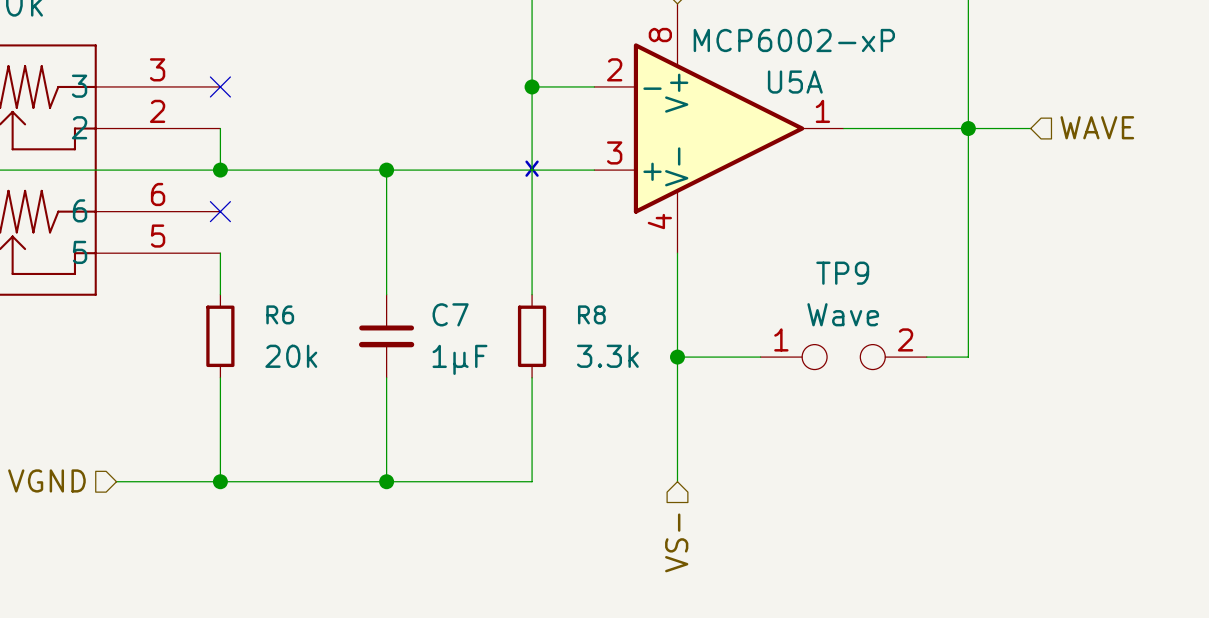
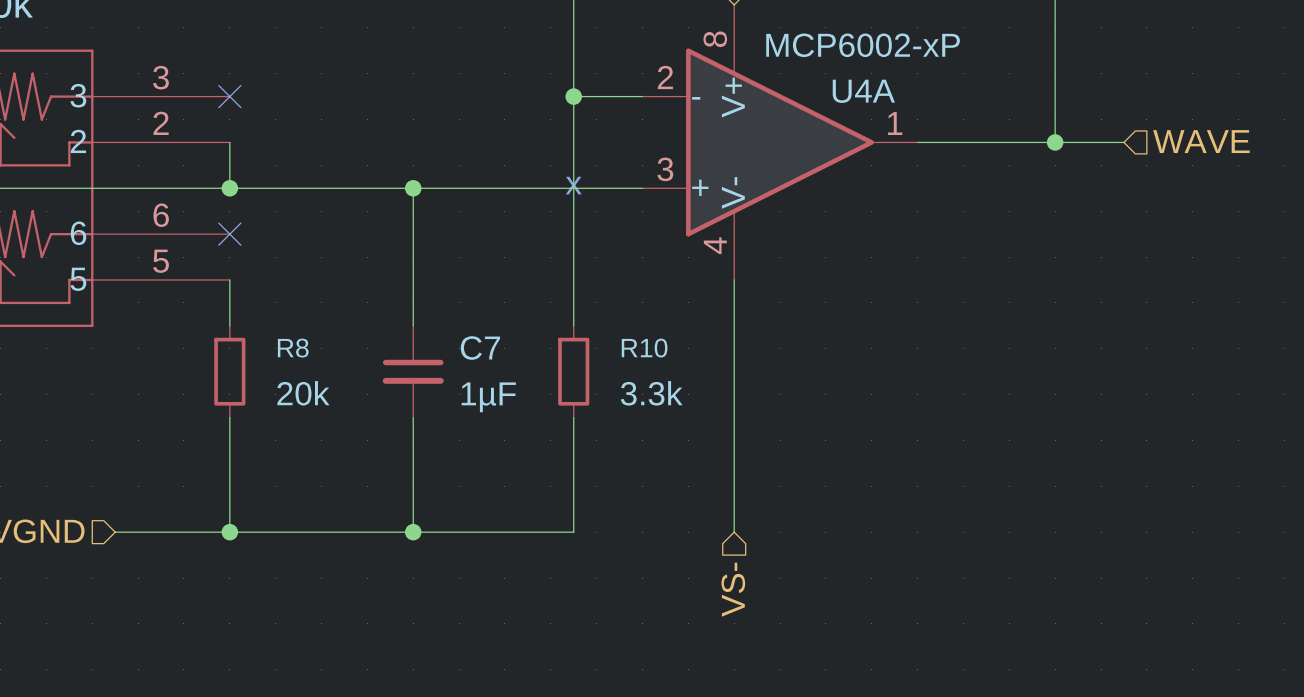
U5A name: U5A (795, 82) -> U4A (863, 91)
wire: (968, 128) (968, 357) (926, 357) -> none
R6 name: R6 (280, 314) -> R8 (293, 348)
R8 name: R8 (591, 314) -> R10 (644, 348)
wire: (677, 357) (760, 357) -> none
junction: (677, 357) -> none
TP9: Wave (843, 357) -> none

